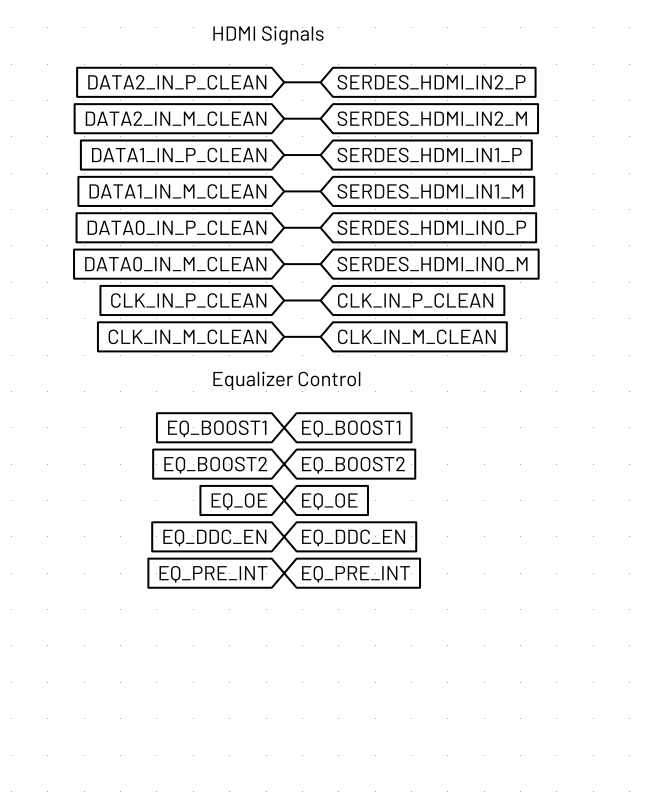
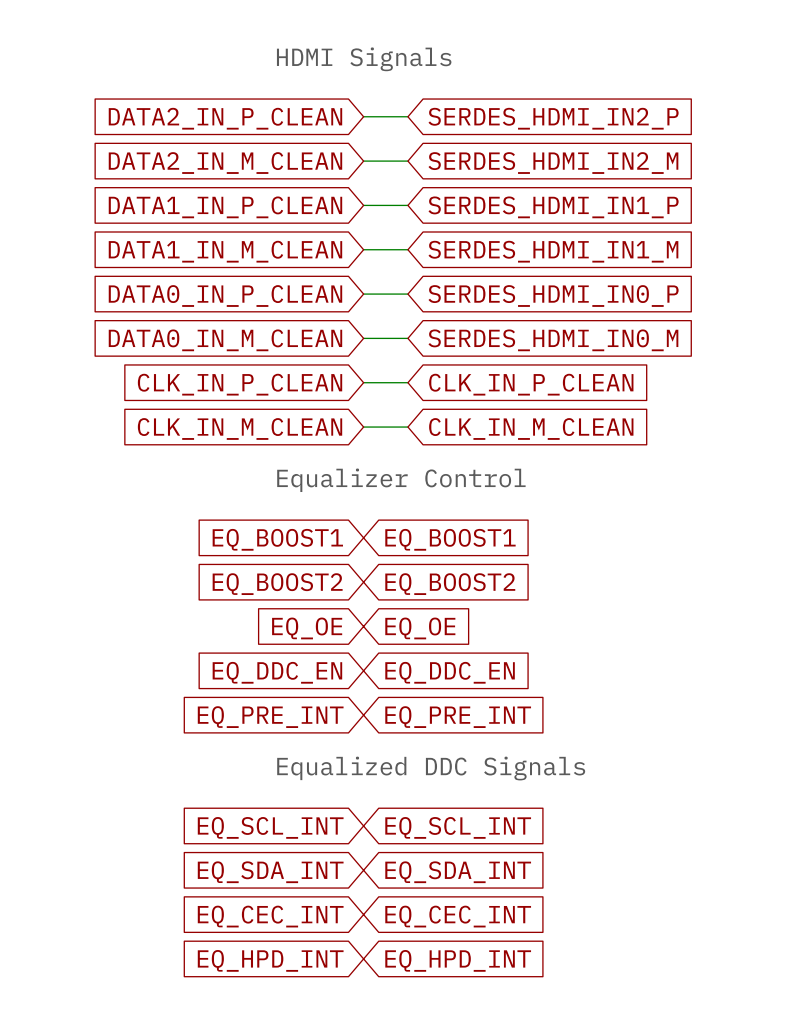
text: none -> Equalized DDC Signals (431, 768)
global label: none -> EQ_SCL_INT (270, 827)
global label: none -> EQ_SCL_INT (458, 827)
global label: none -> EQ_SDA_INT (270, 872)
global label: none -> EQ_SDA_INT (458, 872)
global label: none -> EQ_CEC_INT (270, 916)
global label: none -> EQ_CEC_INT (458, 916)
global label: none -> EQ_HPD_INT (270, 960)
global label: none -> EQ_HPD_INT (458, 960)

